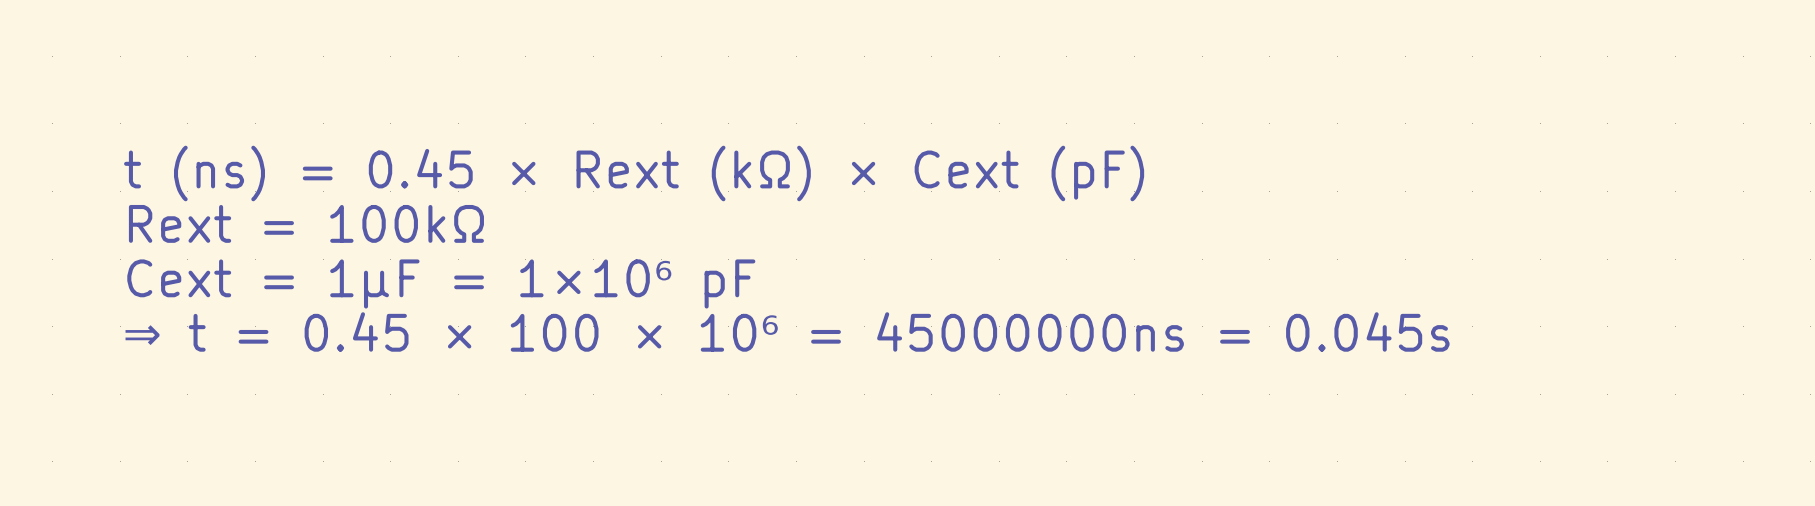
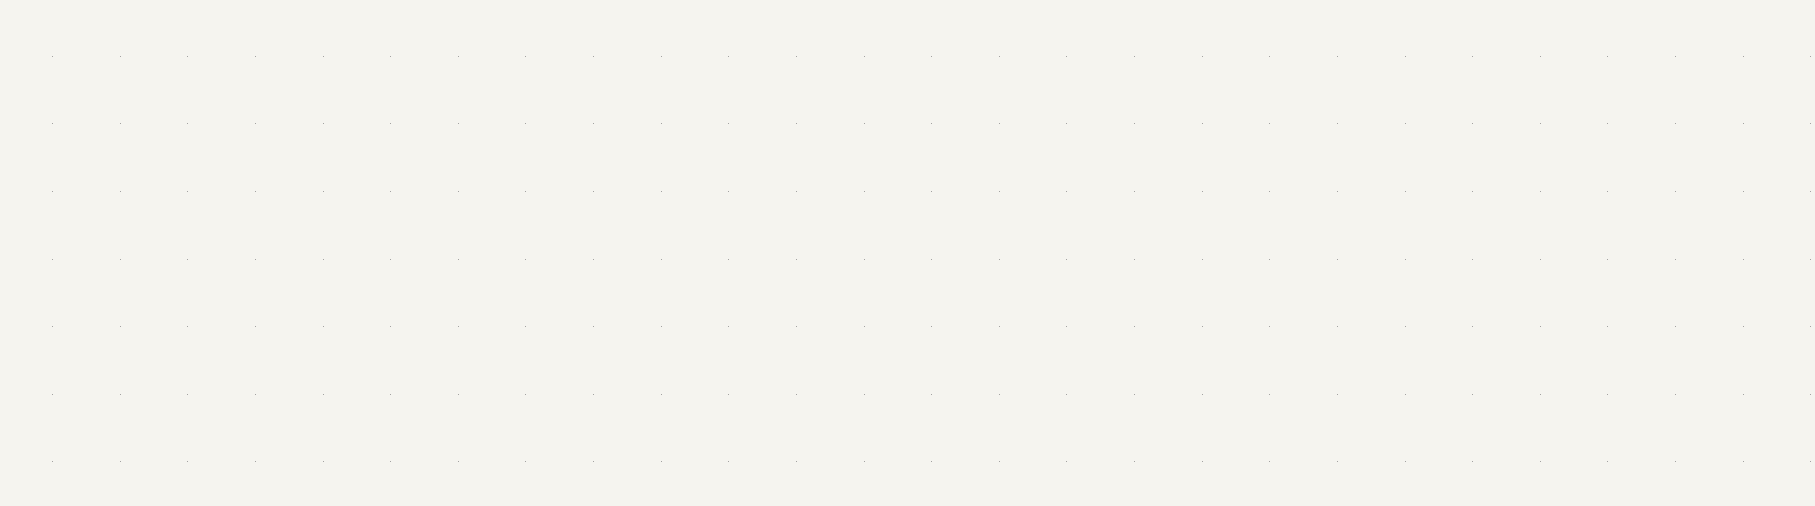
text: t (ns) = 0.45 × Rext (kΩ) × Cext (pF) (634, 173) -> none
text: Rext = 100kΩ (306, 223) -> none
text: Cext = 1μF = 1×10⁶ pF (441, 283) -> none
text: ⇒ t = 0.45 × 100 × 10⁶ = 45000000ns = 0.045s (786, 331) -> none

